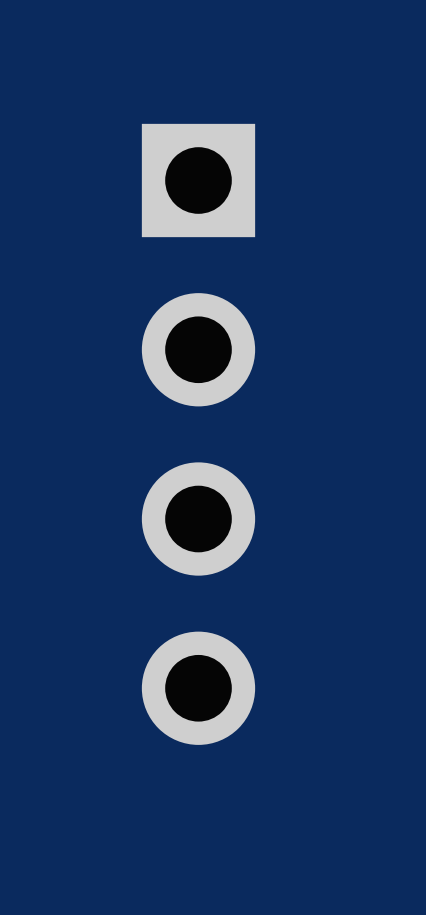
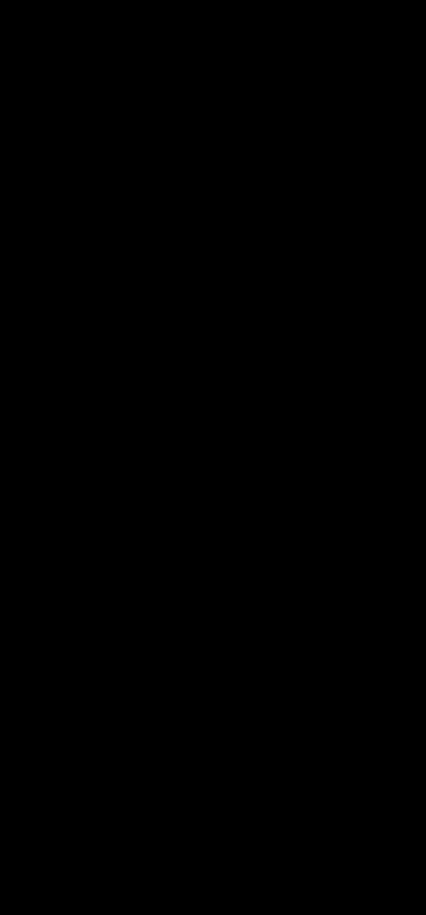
part: (198, 434) -> none

